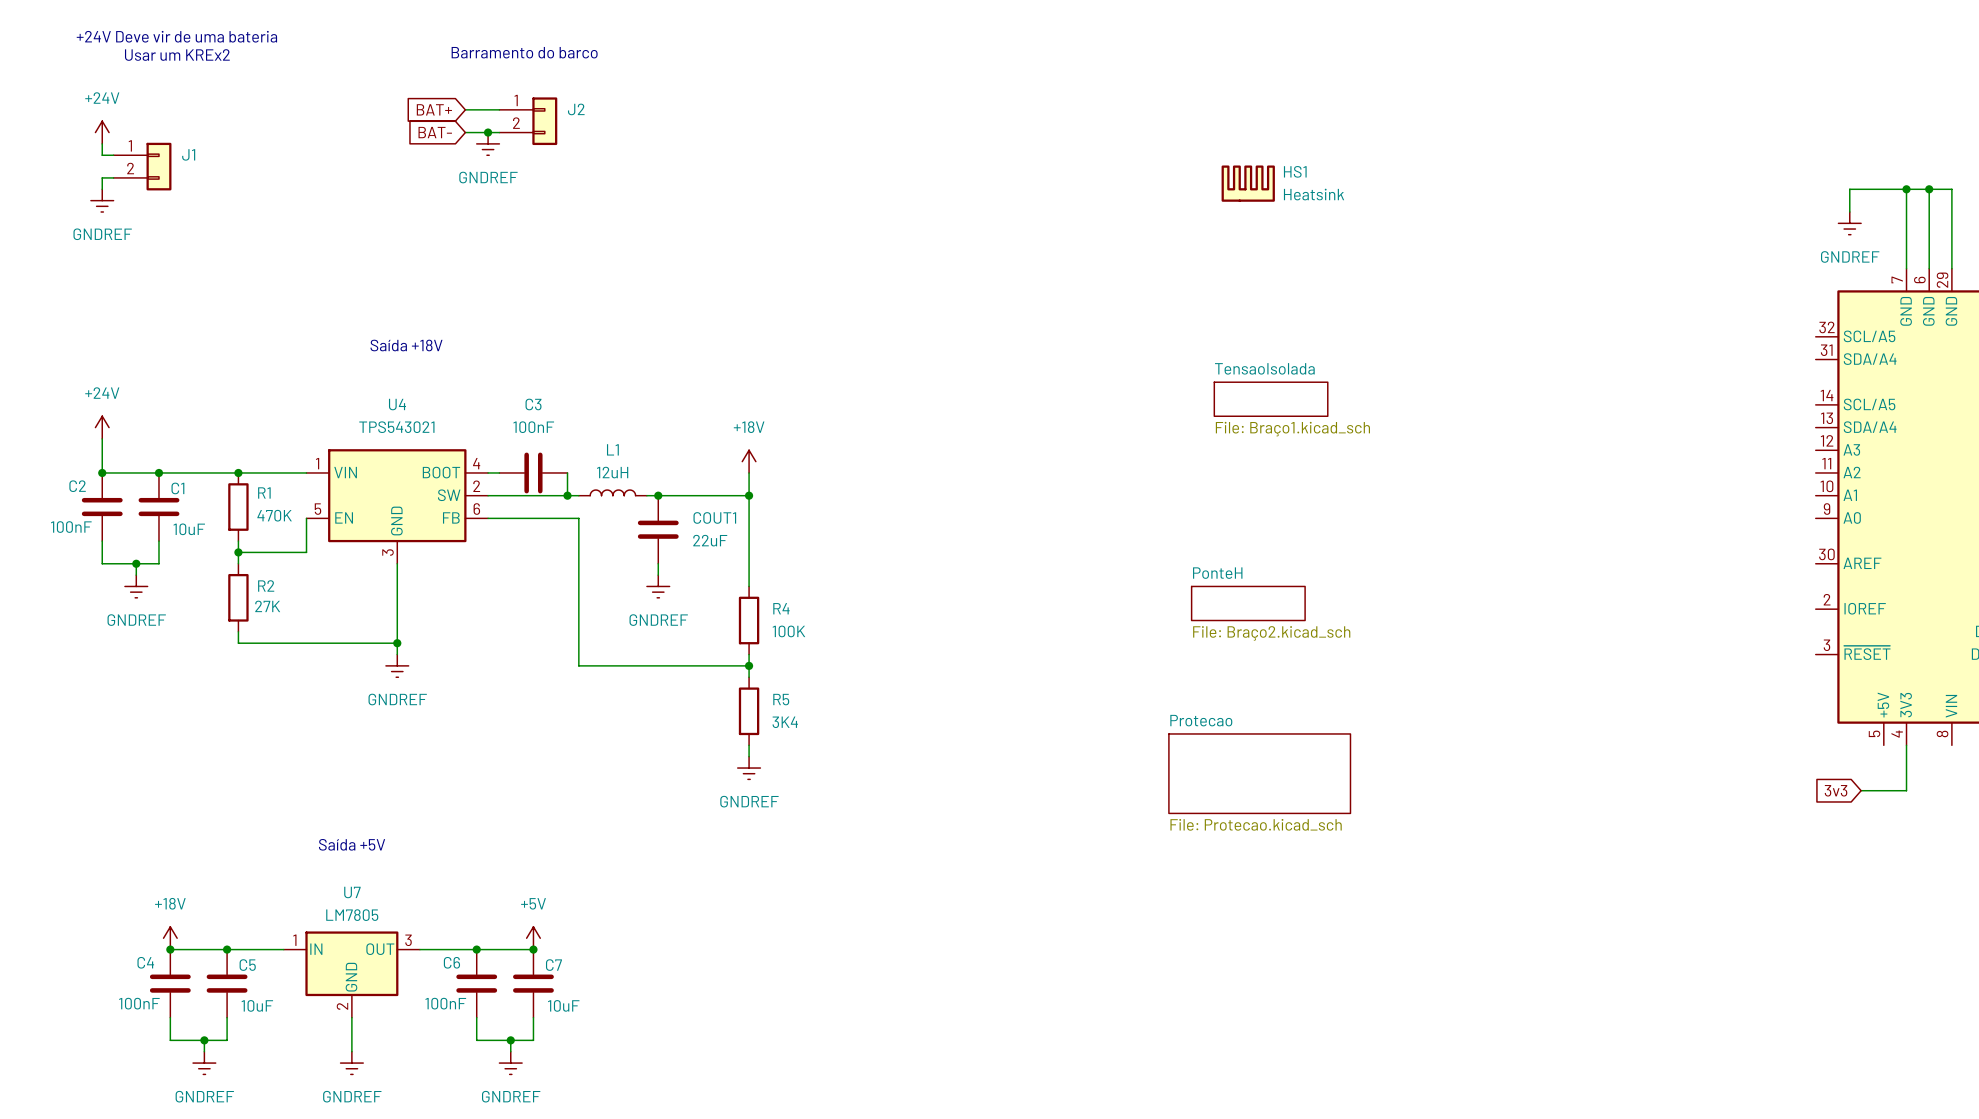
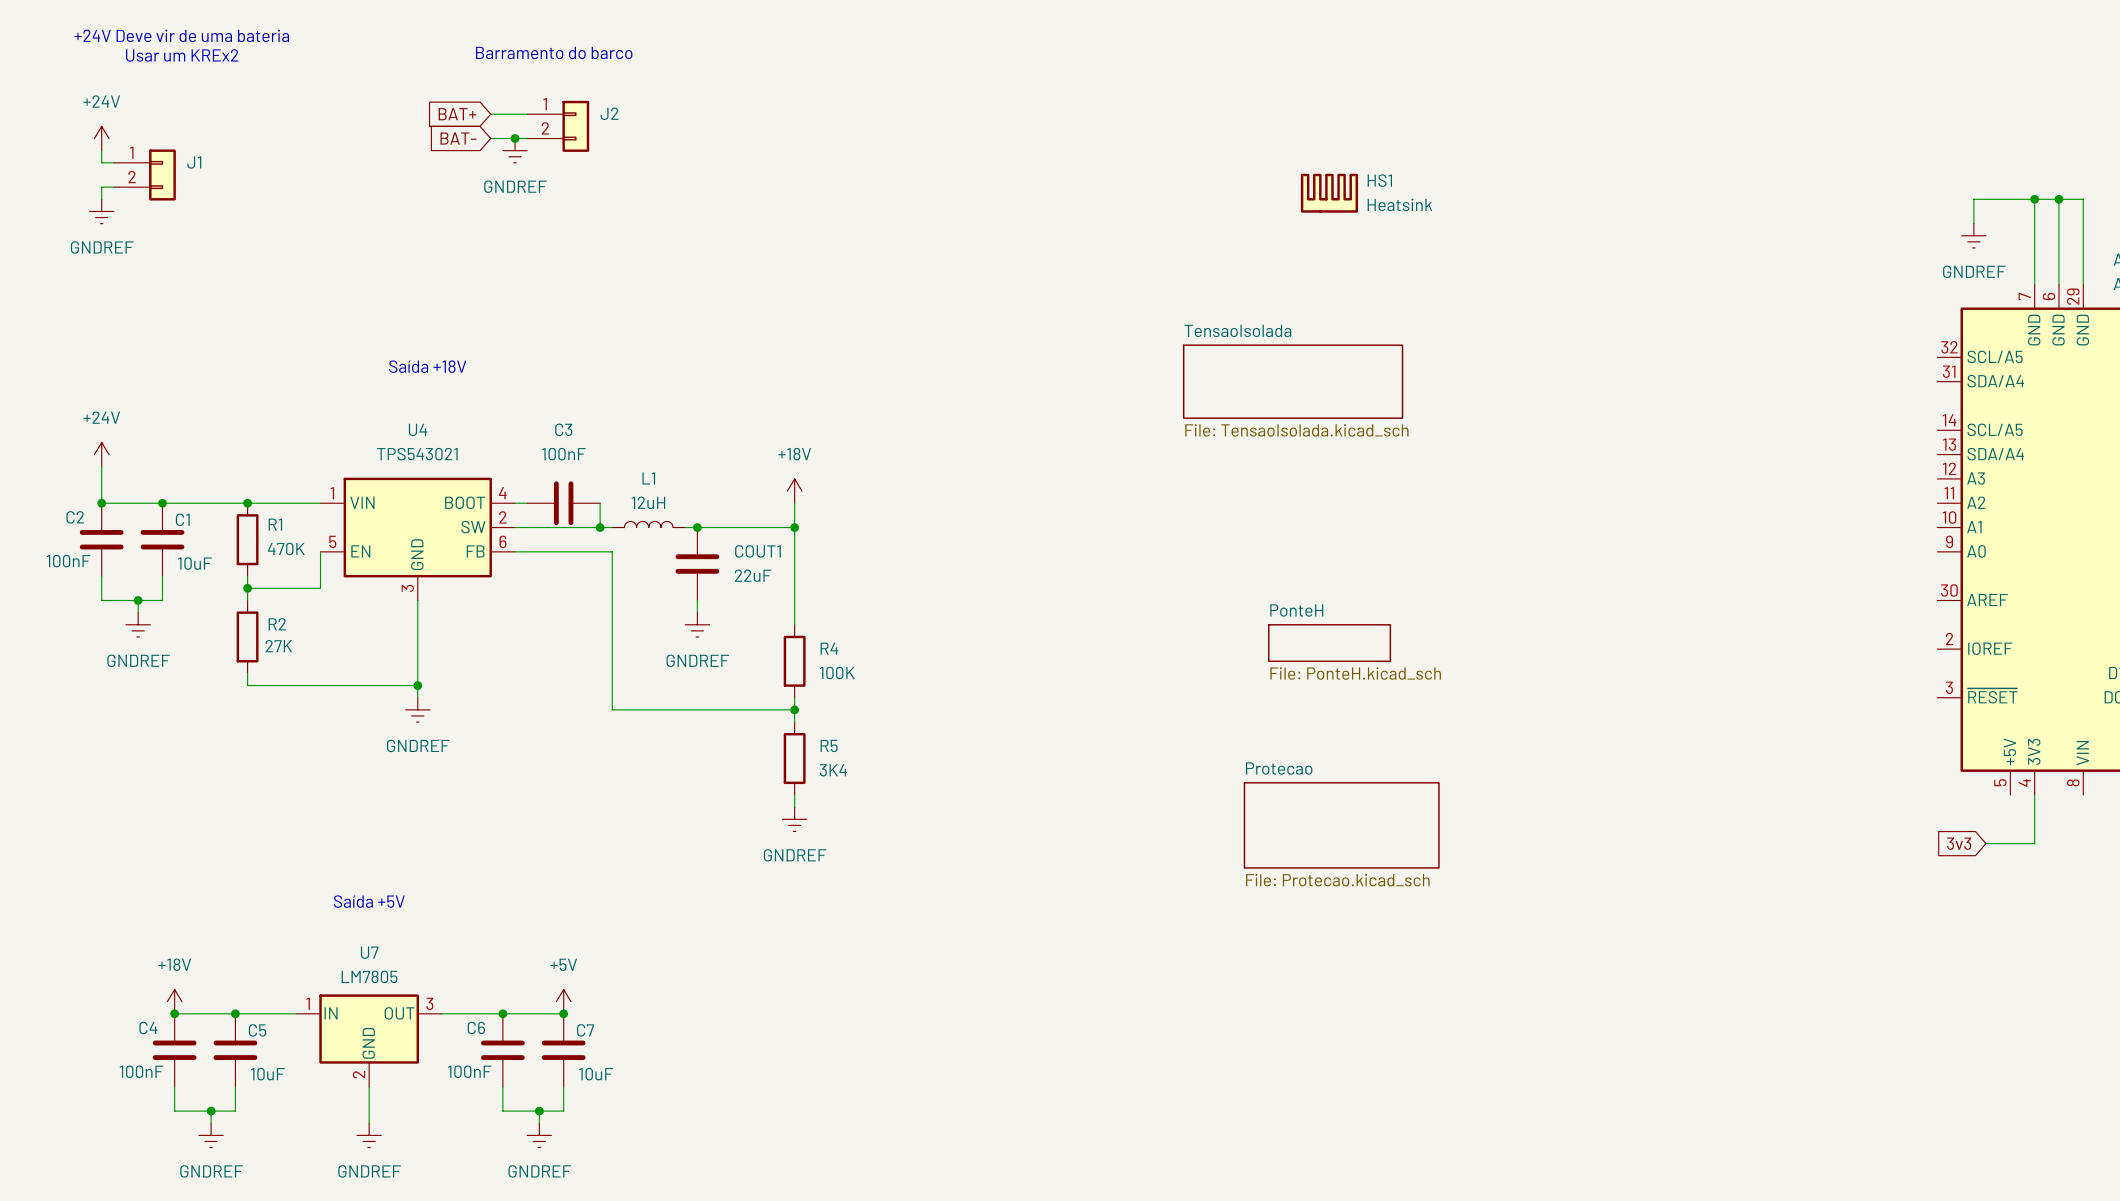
sheet TensaoIsolada: none -> File: TensaoIsolada.kicad_sch (1293, 381)
sheet TensaoIsolada: File: Braço1.kicad_sch (1271, 399) -> none
sheet PonteH value: File: Braço2.kicad_sch (1271, 633) -> File: PonteH.kicad_sch (1355, 673)

